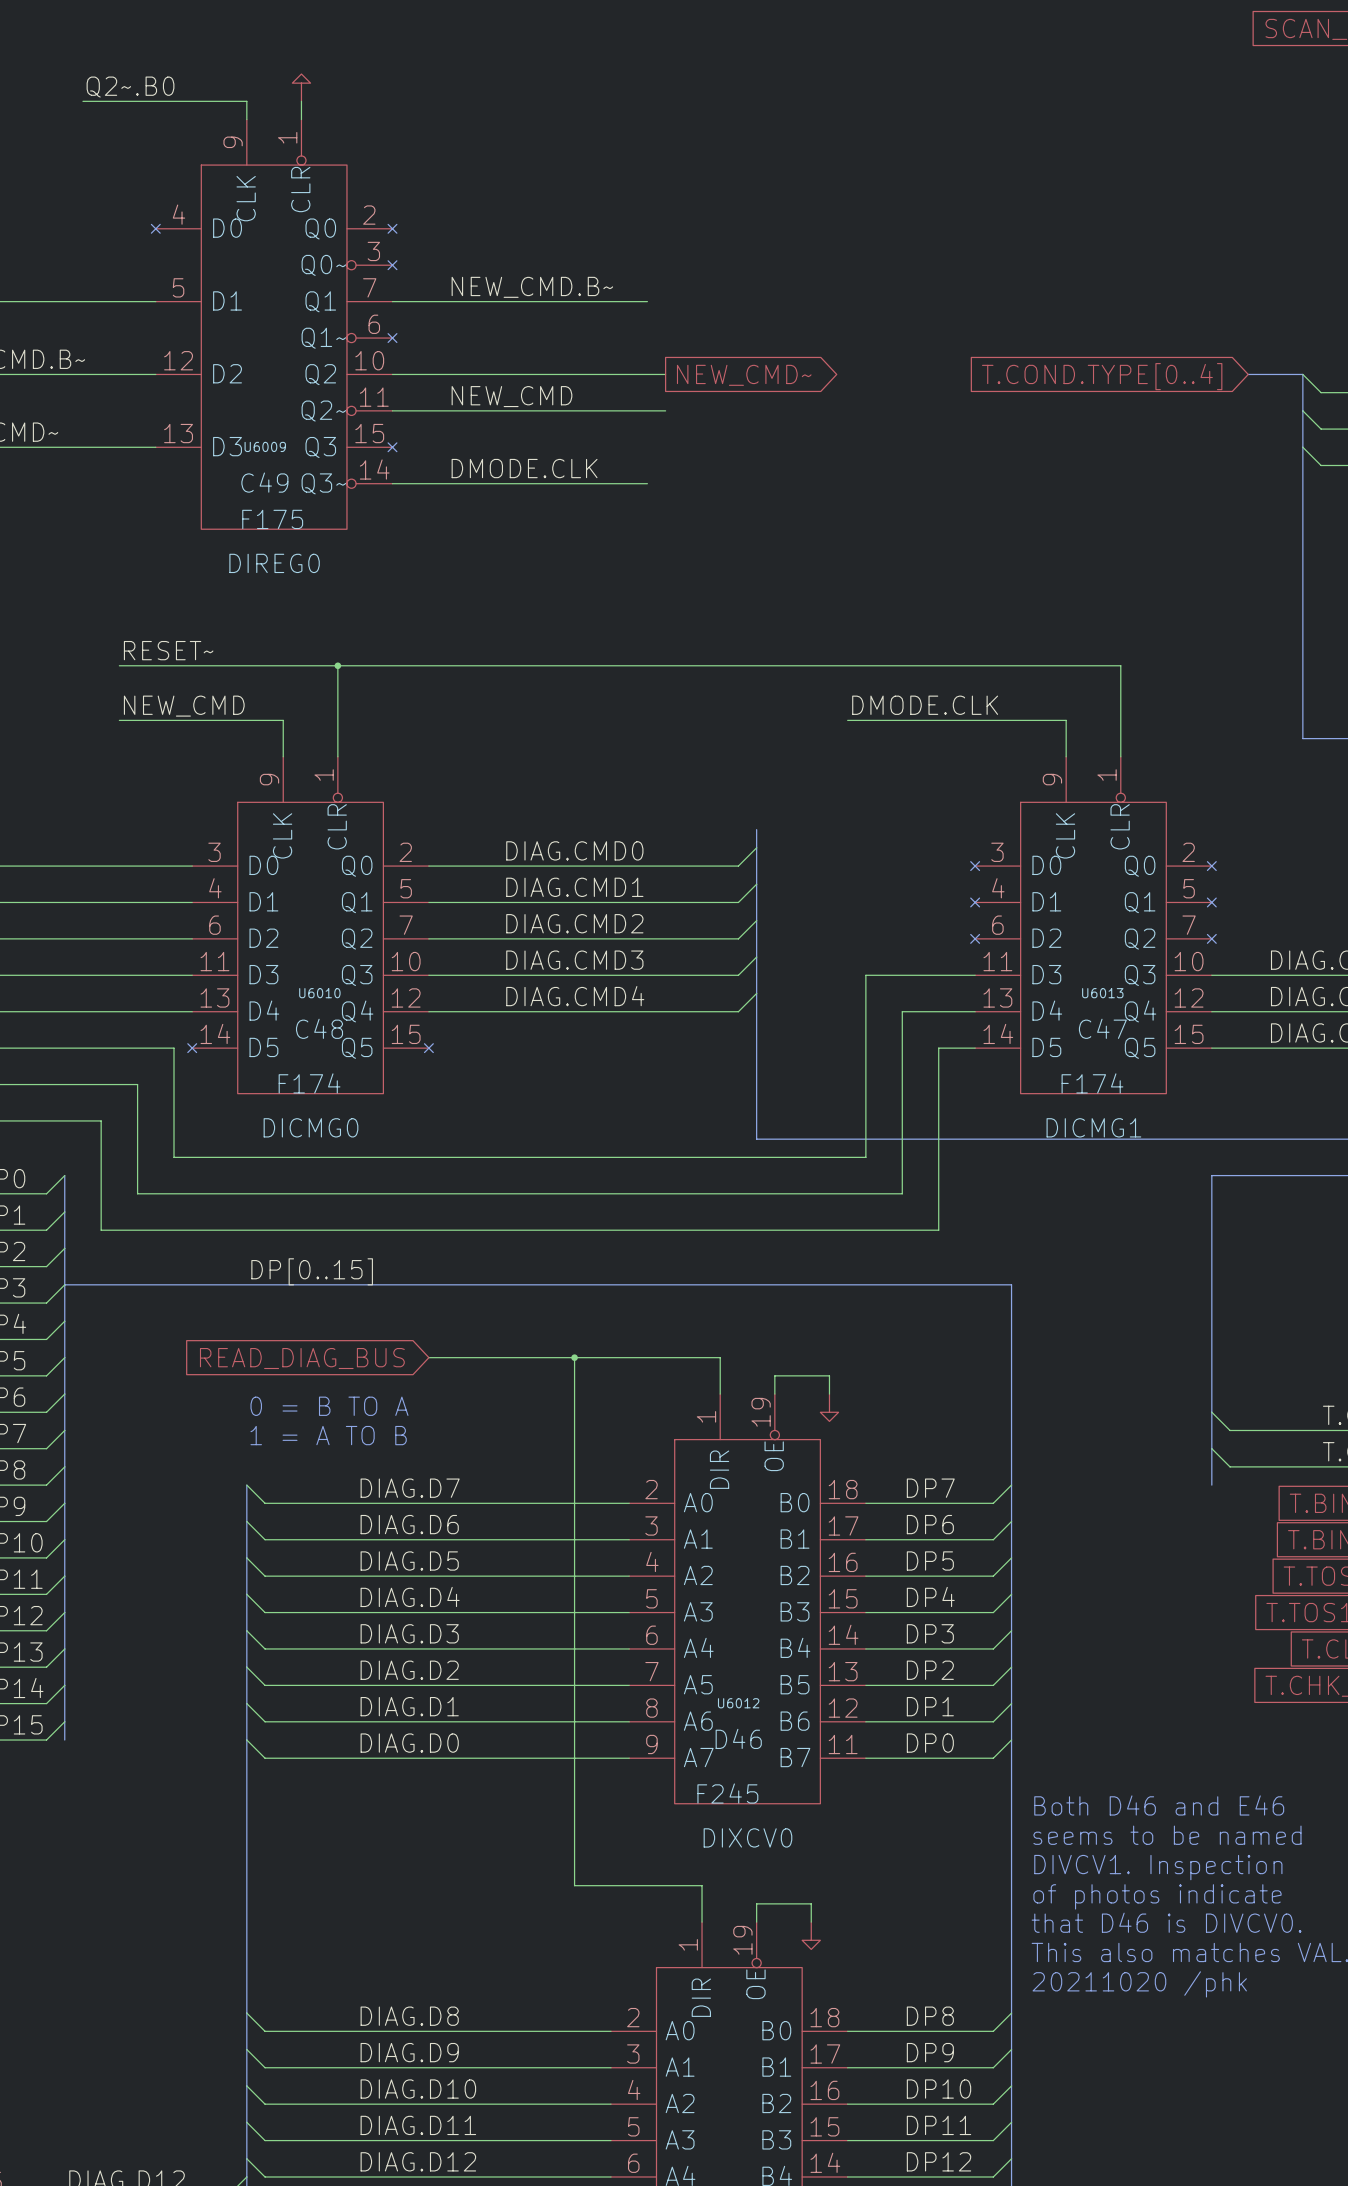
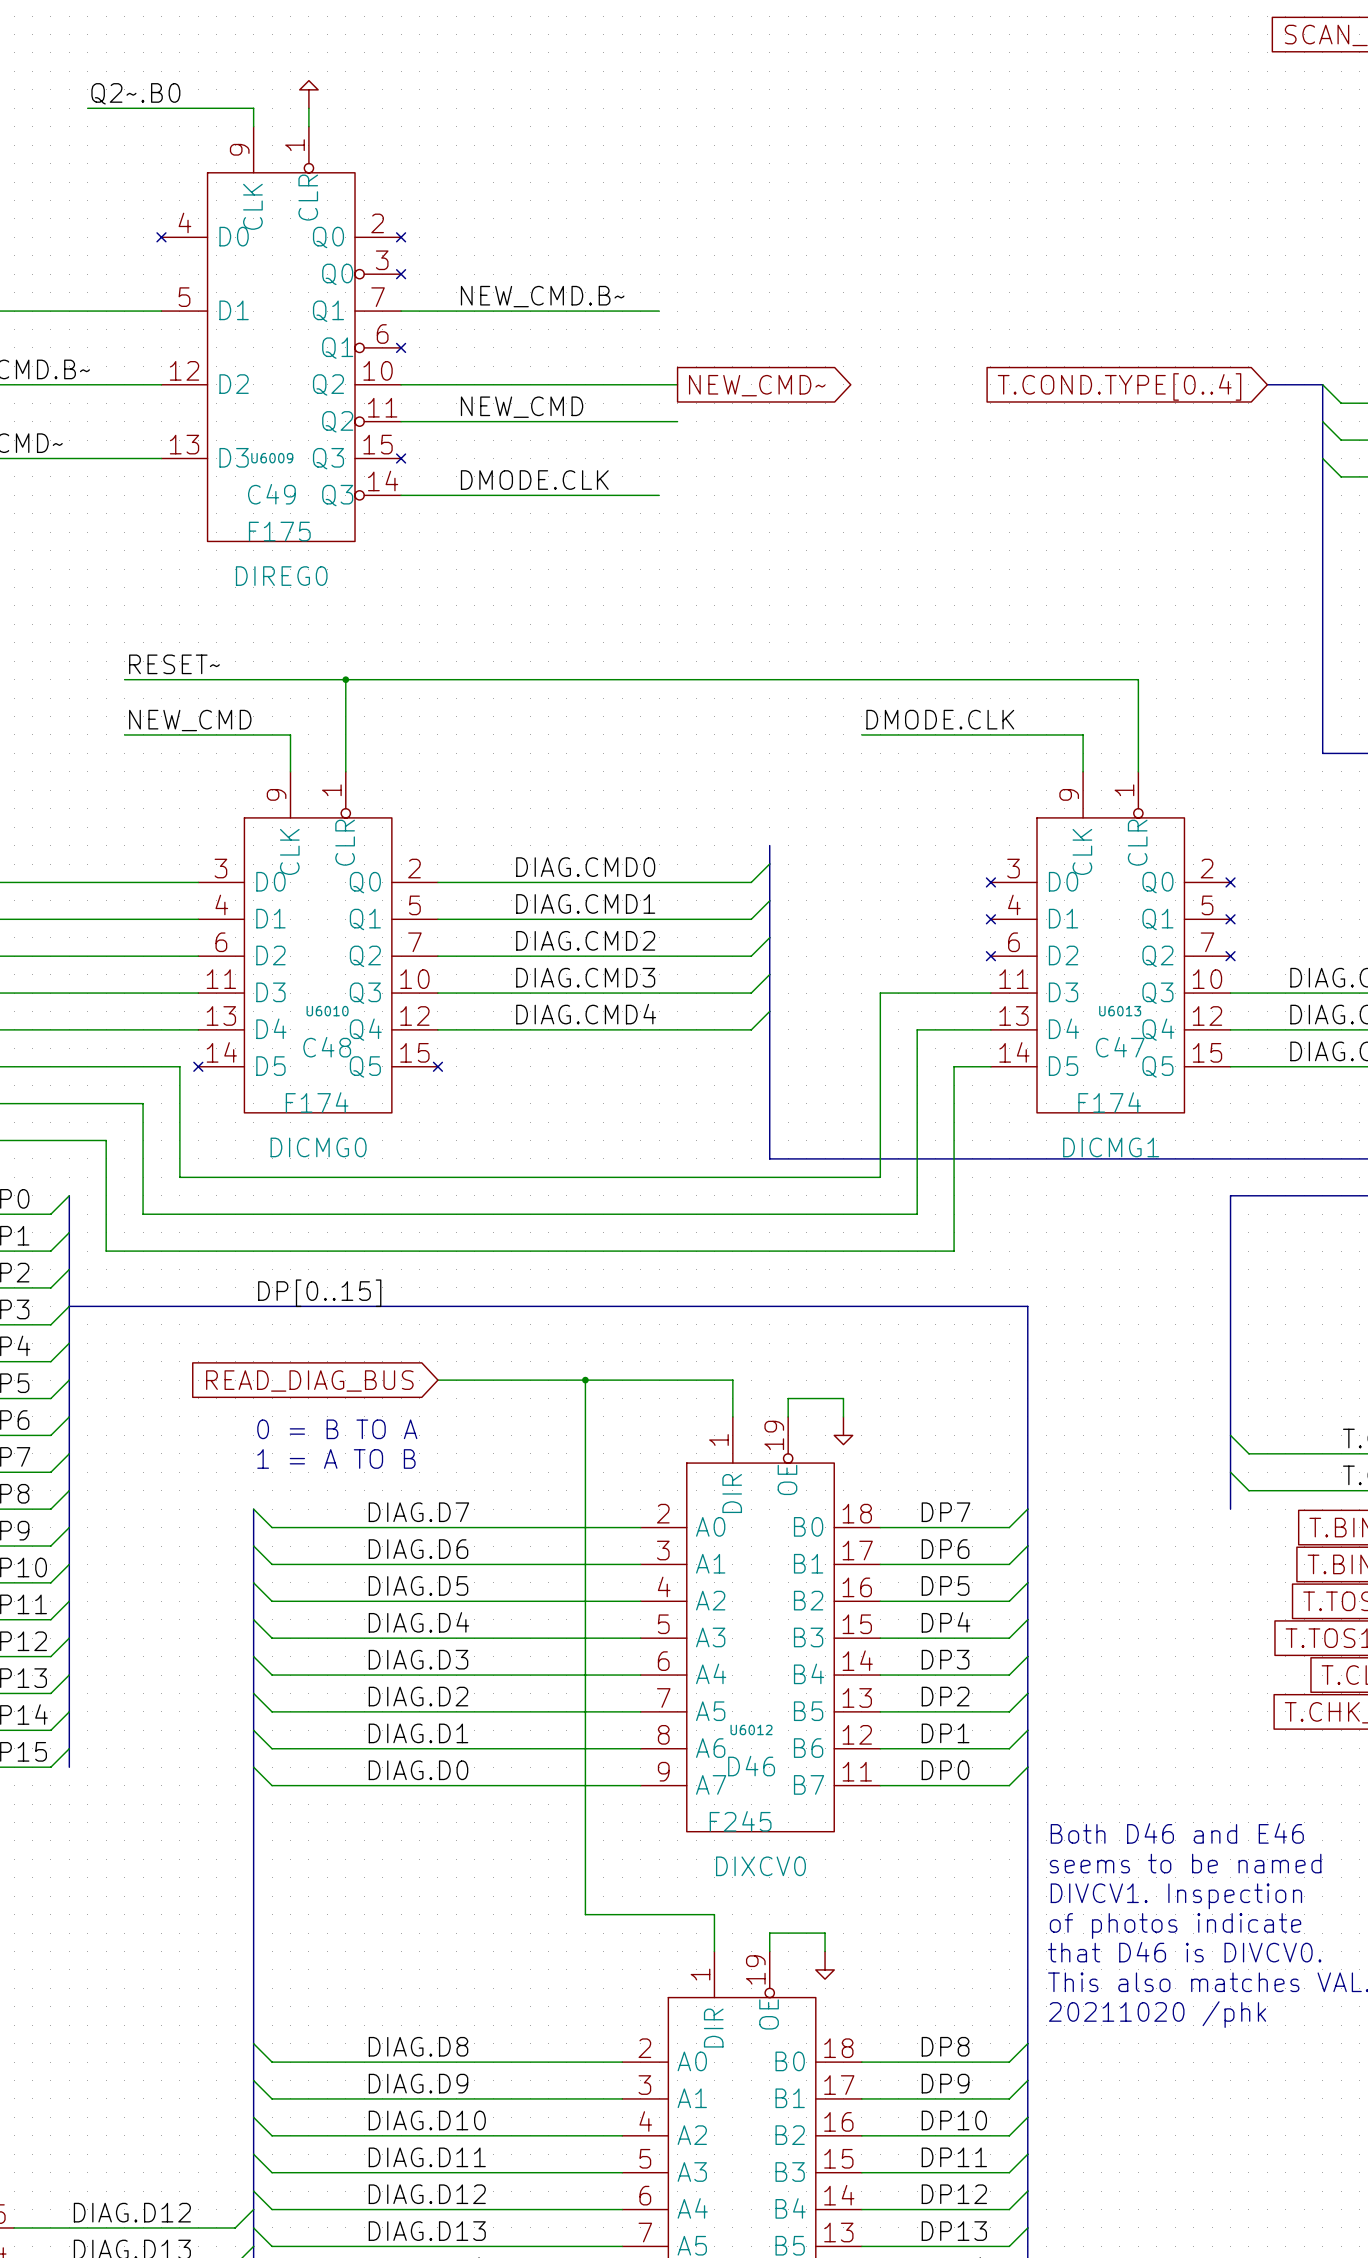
U6009 pin name: Q0~ (323, 265) -> Q0 (337, 274)
U6009 pin name: Q1~ (323, 338) -> Q1 (337, 348)
U6009 pin name: Q2~ (323, 411) -> Q2 (337, 421)
U6009 pin name: Q3~ (323, 483) -> Q3 (337, 495)

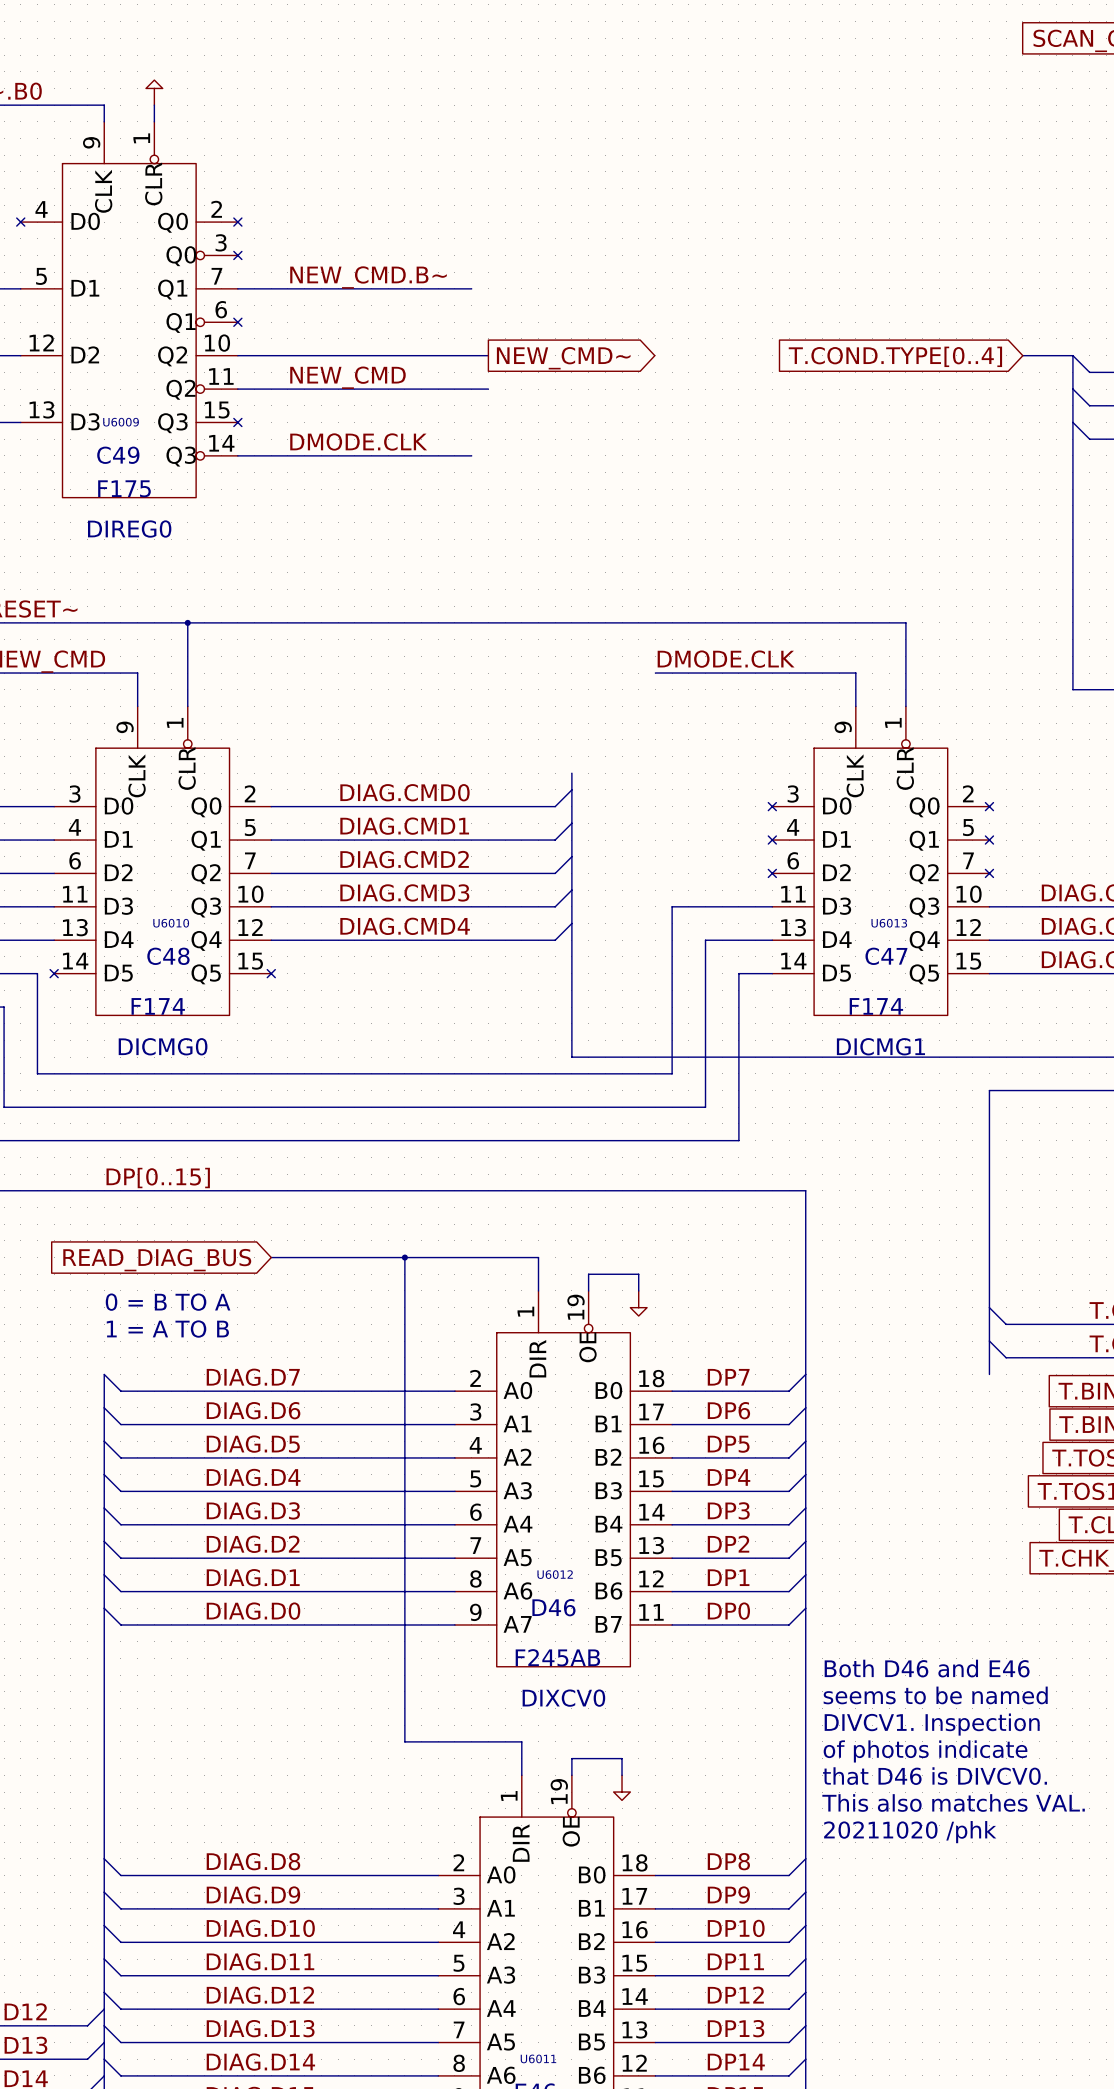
U6012 value: F245 (740, 1821) -> F245AB (557, 1657)

